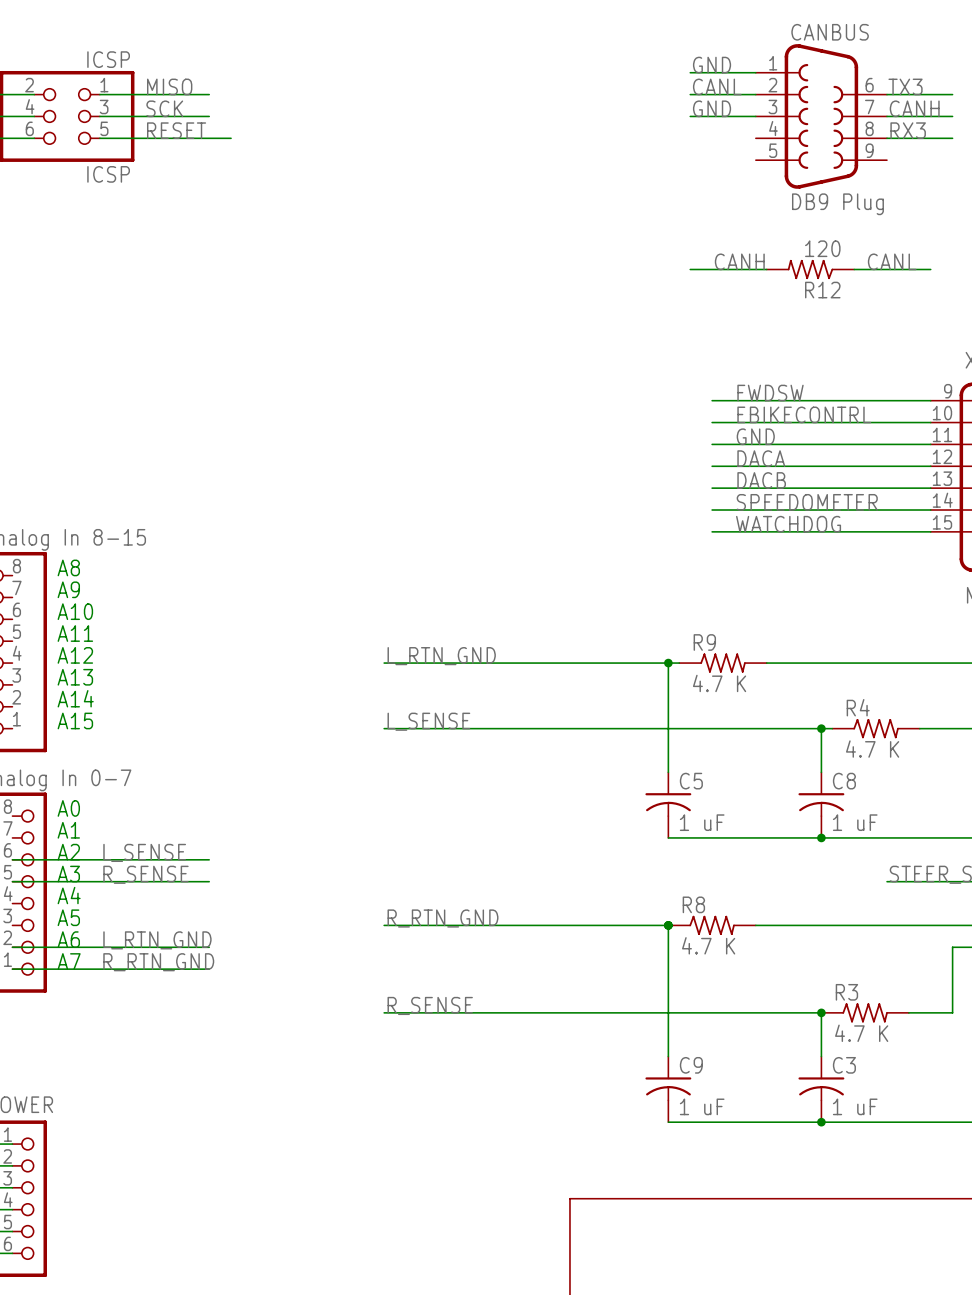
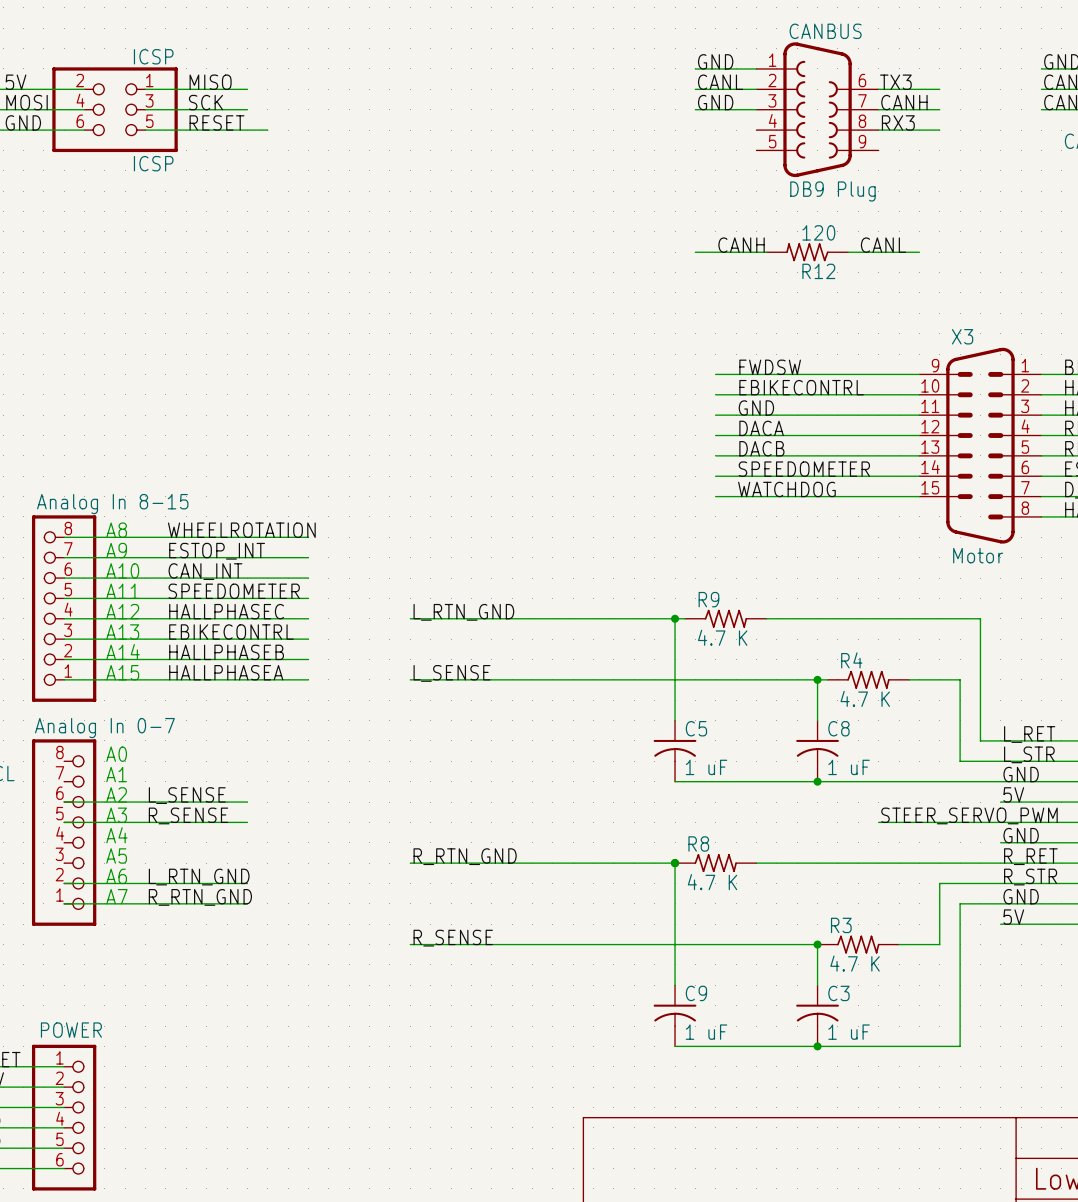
label: none -> WHEELROTATION (241, 530)
wire: none -> (64, 537) (308, 537)
label: none -> ESTOP_INT (217, 551)
wire: none -> (64, 557) (308, 557)
label: none -> CAN_INT (205, 571)
wire: none -> (64, 578) (308, 578)
label: none -> SPEEDOMETER (234, 591)
wire: none -> (64, 598) (308, 598)
label: none -> HALLPHASEC (226, 611)
wire: none -> (64, 618) (308, 618)
label: none -> EBIKECONTRL (231, 632)
wire: none -> (64, 639) (308, 639)
label: none -> HALLPHASEB (226, 652)
wire: none -> (64, 659) (308, 659)
label: none -> HALLPHASEA (226, 672)
wire: none -> (64, 679) (308, 679)

